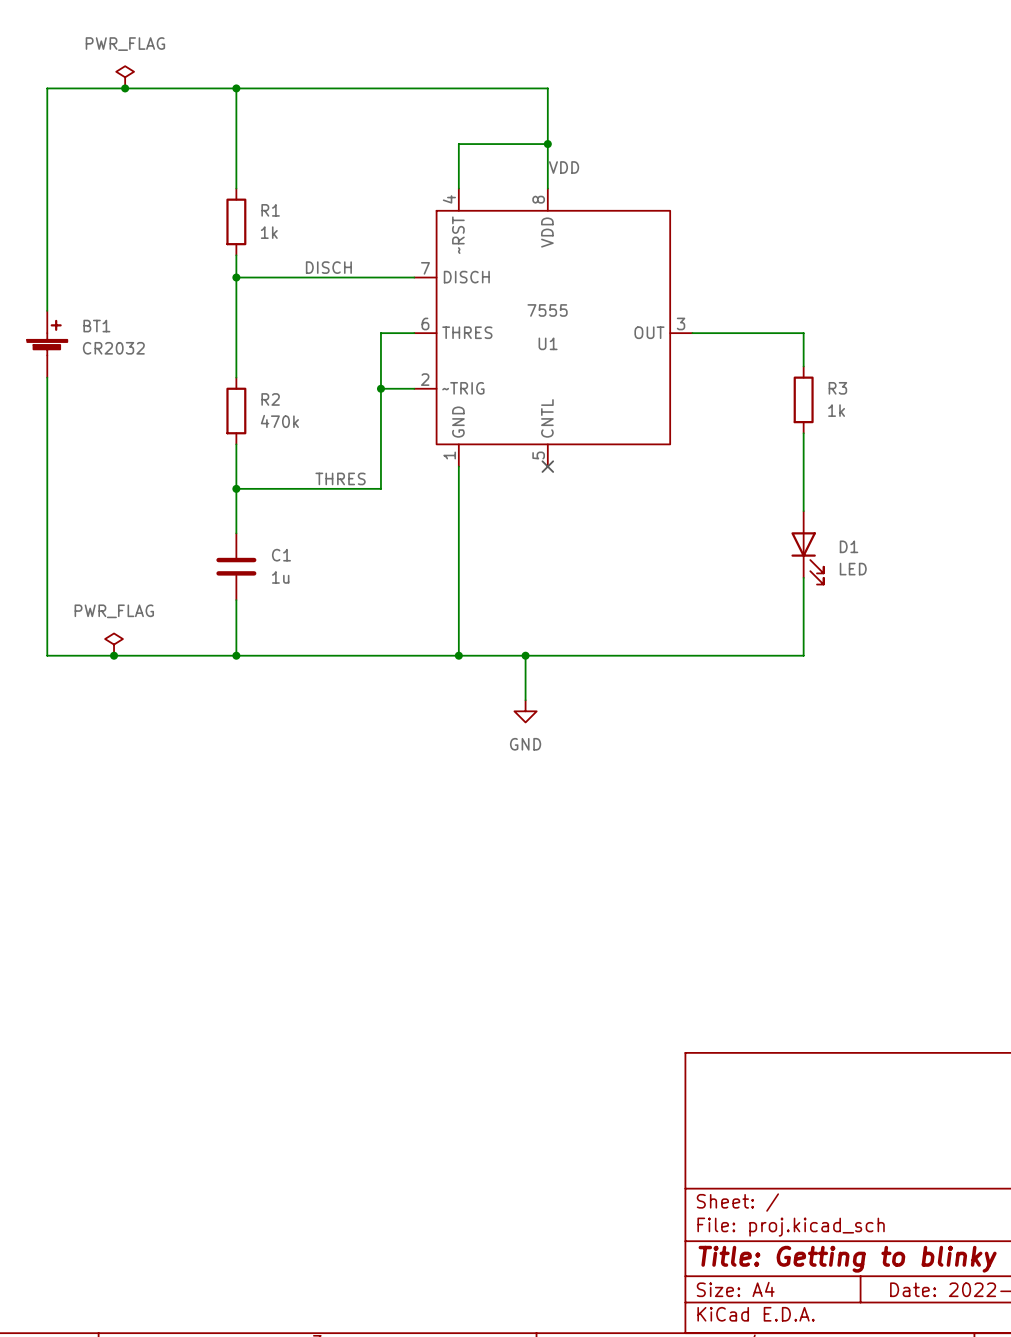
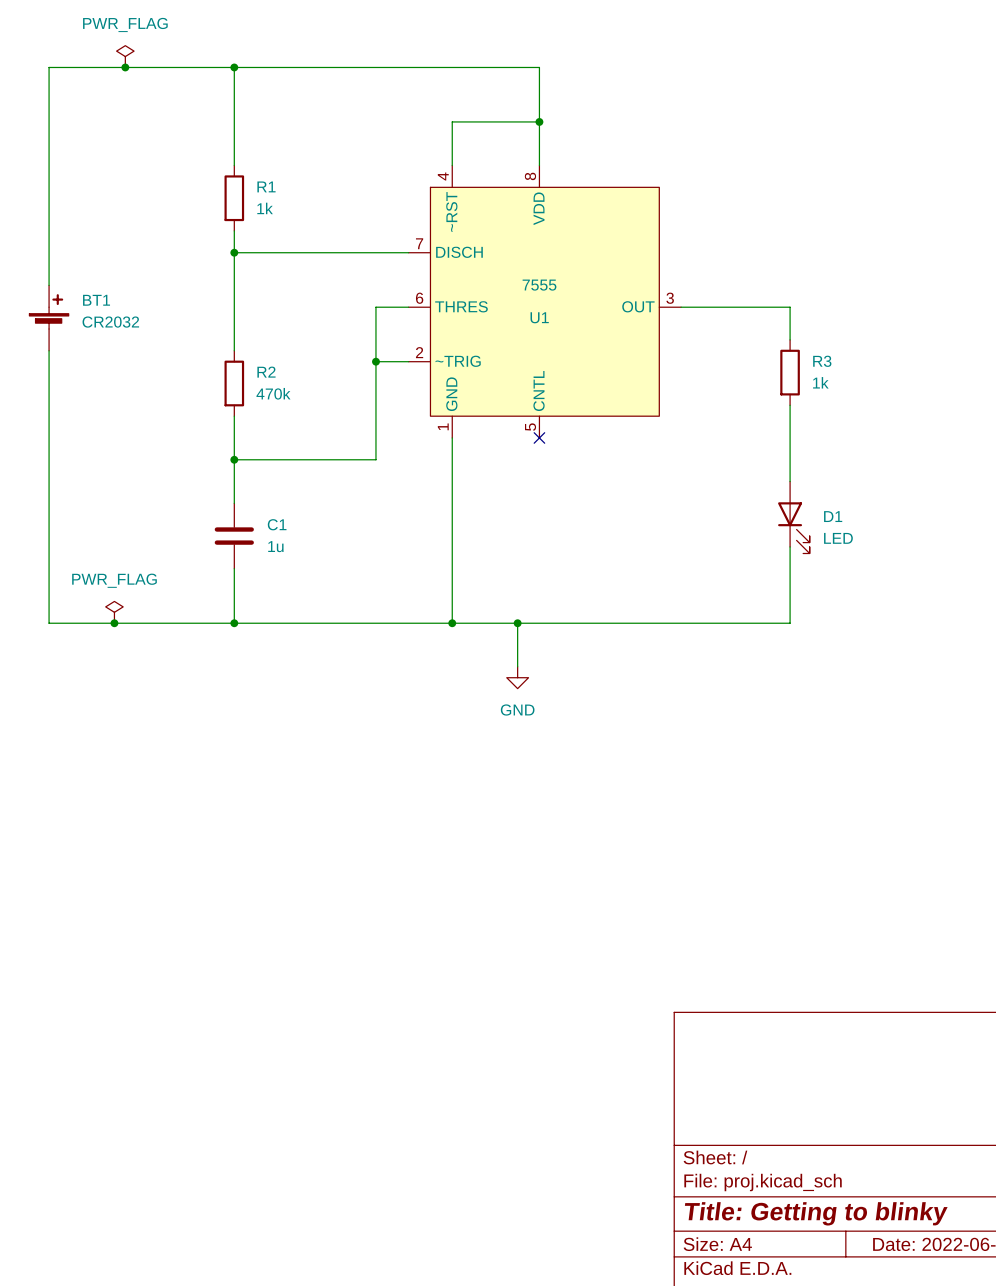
label: VDD (564, 167) -> none
label: DISCH (328, 267) -> none
label: THRES (340, 478) -> none

